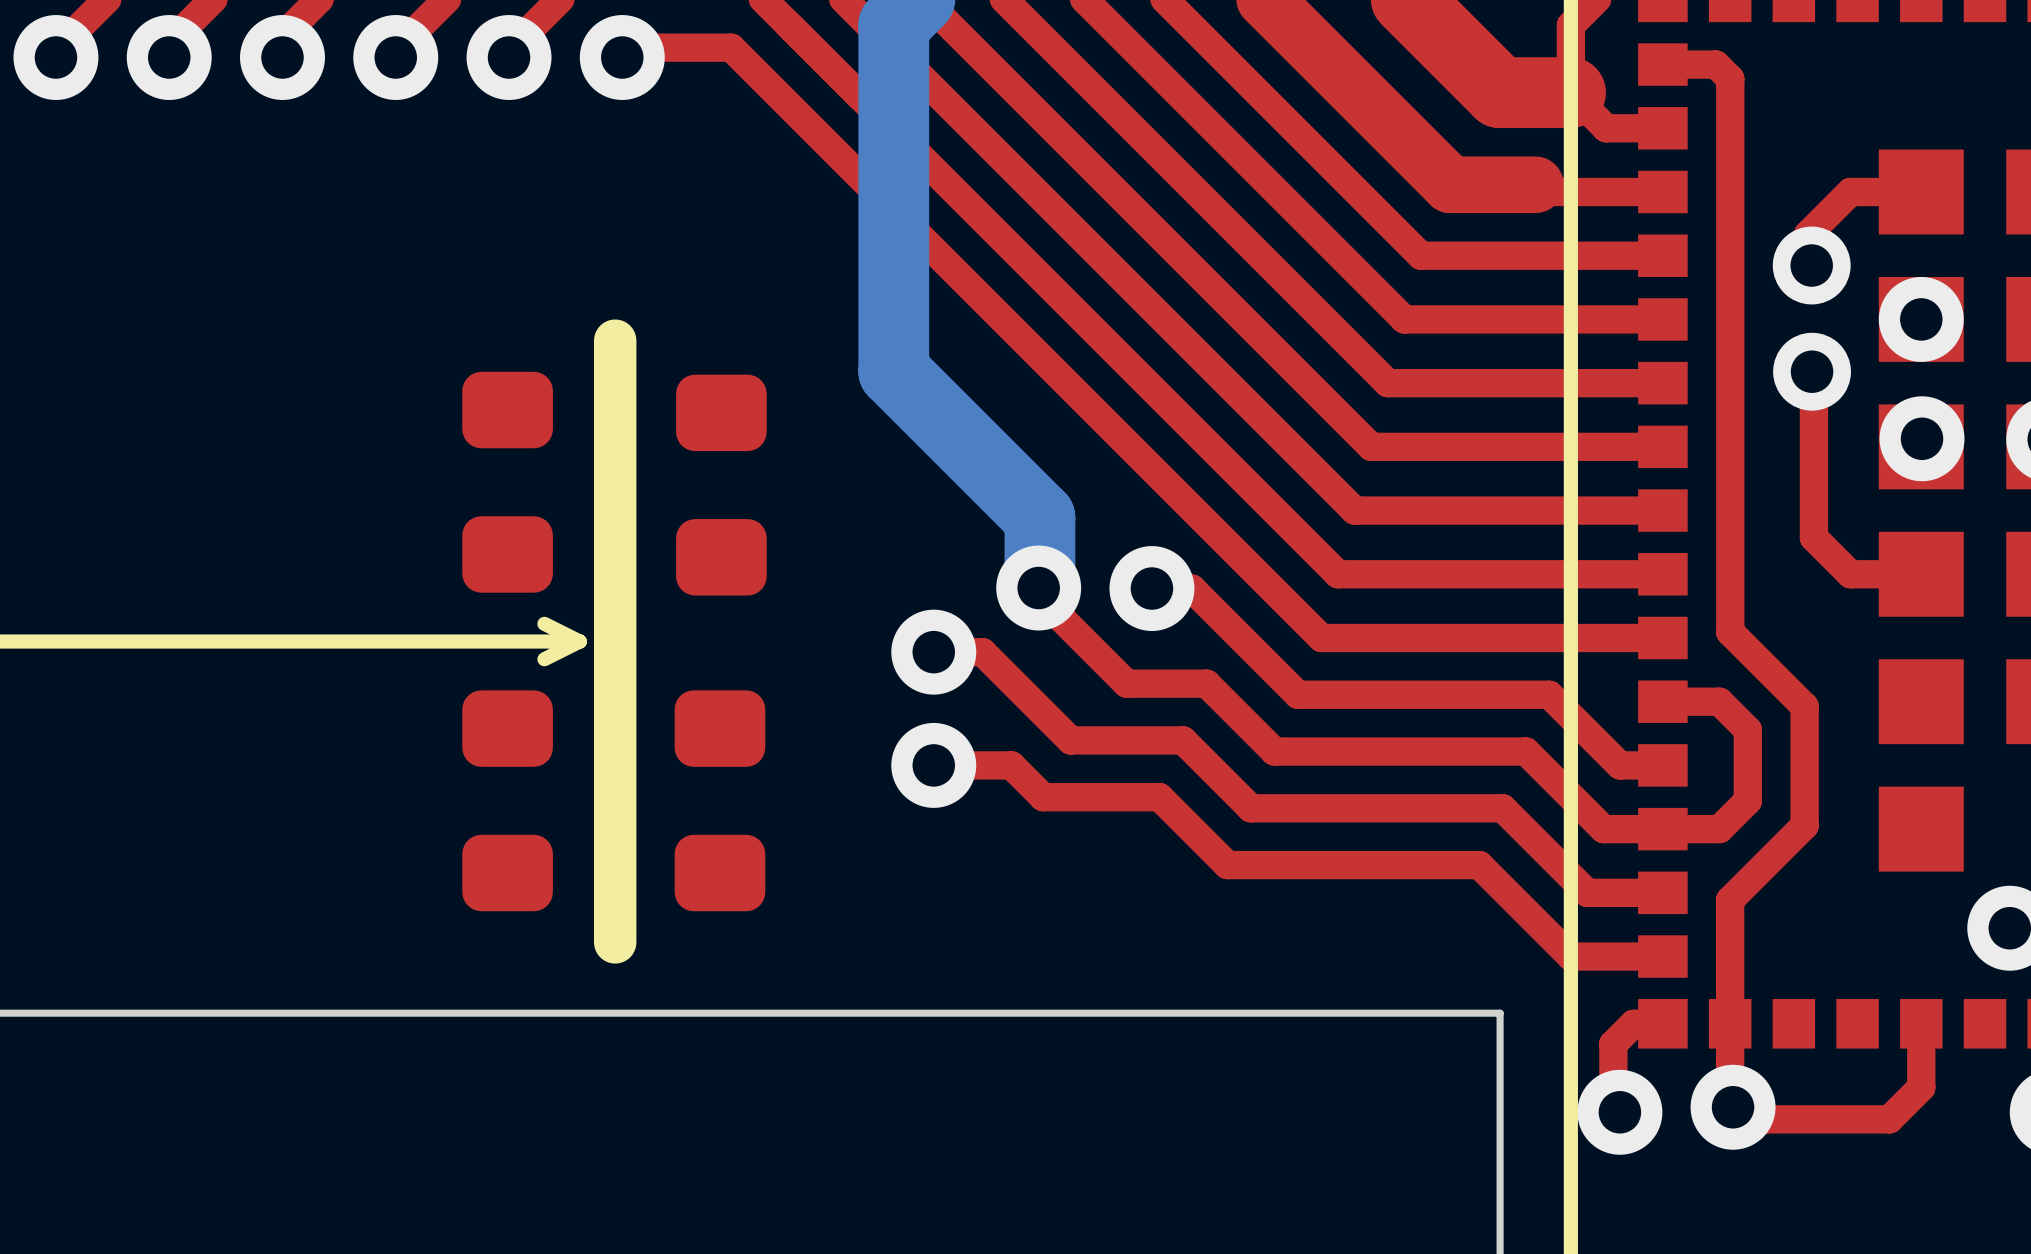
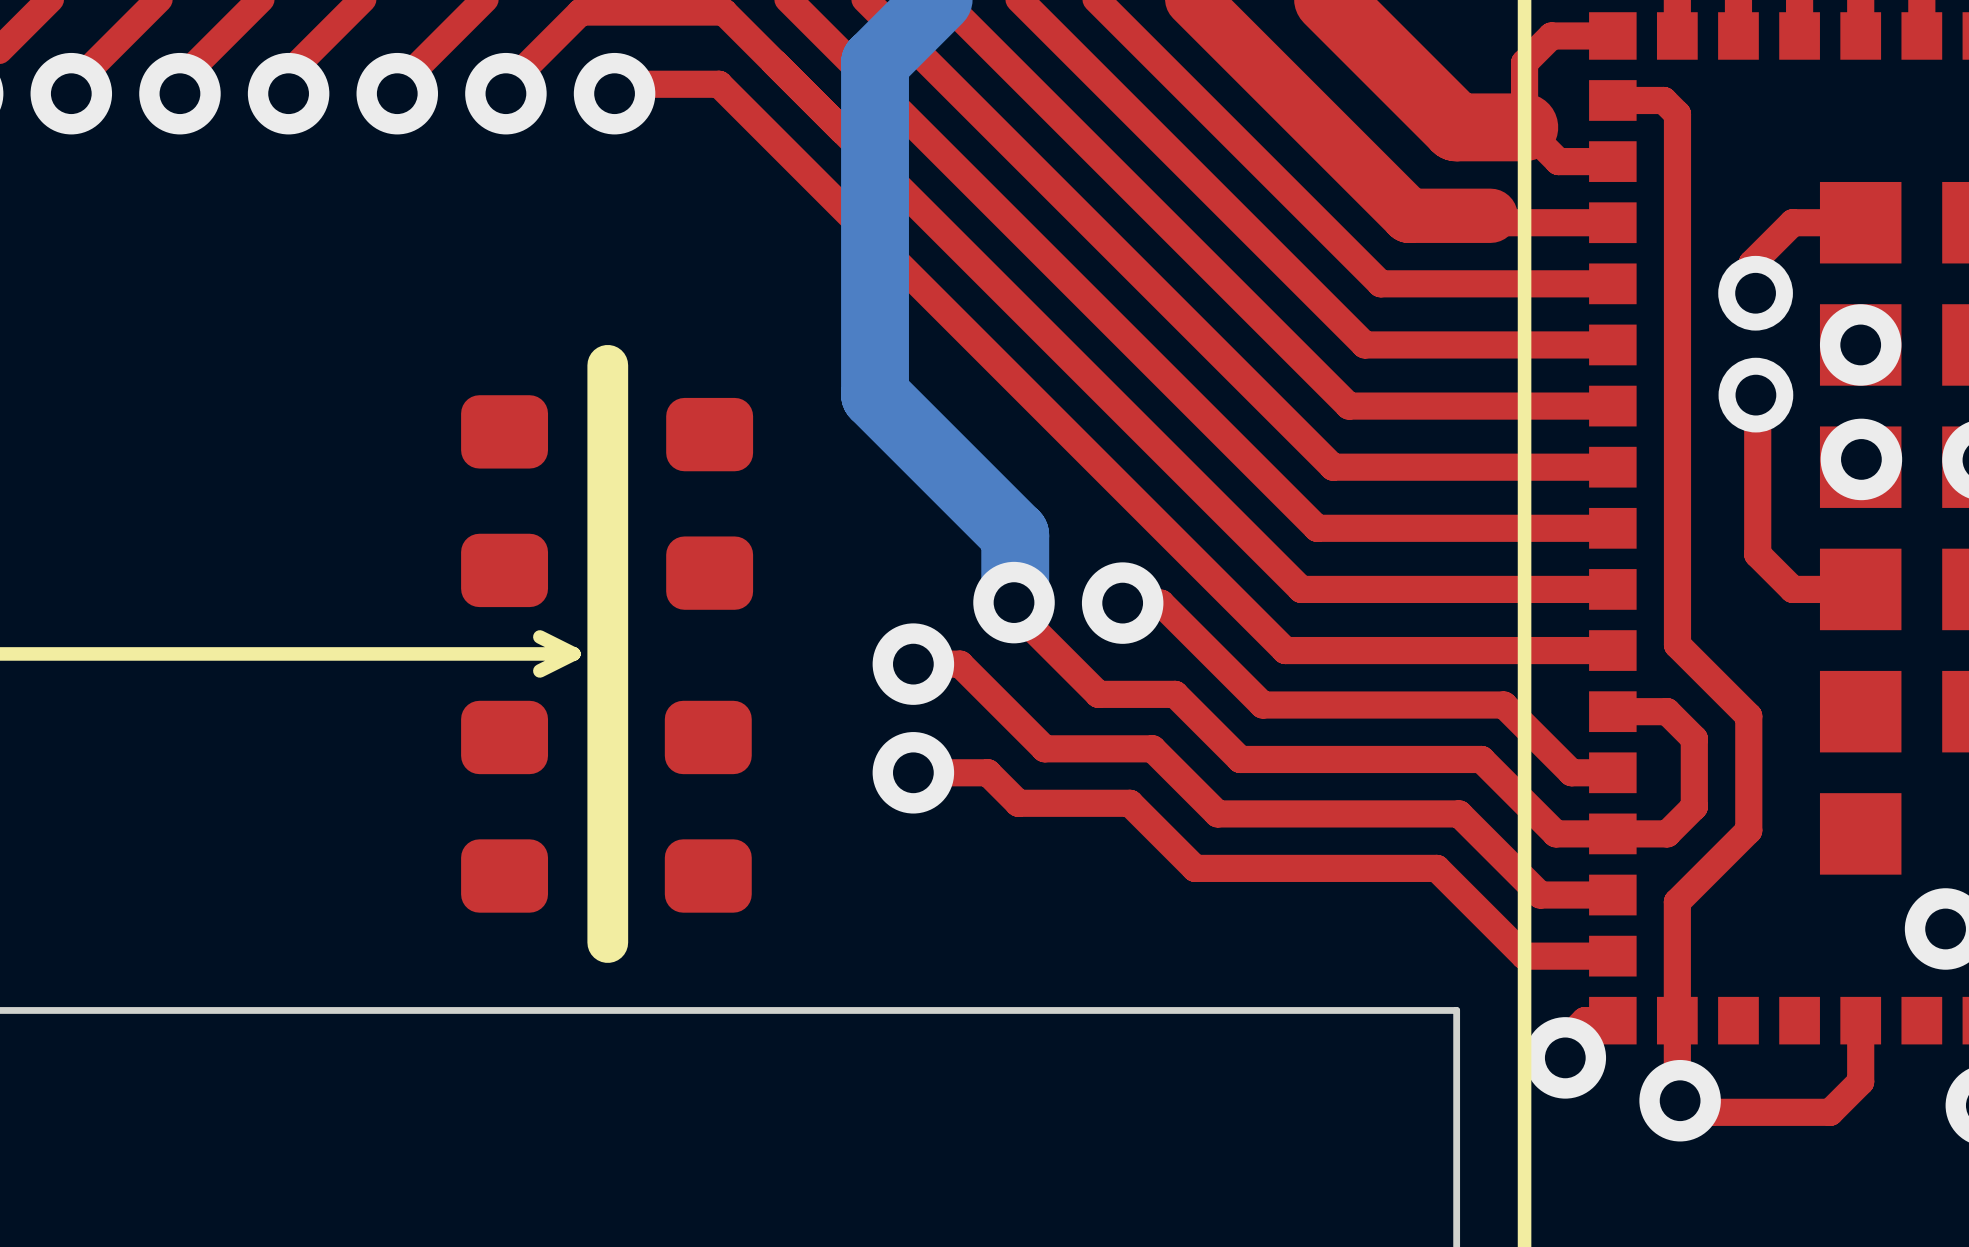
via position: (1619, 1112) -> (1565, 1057)

